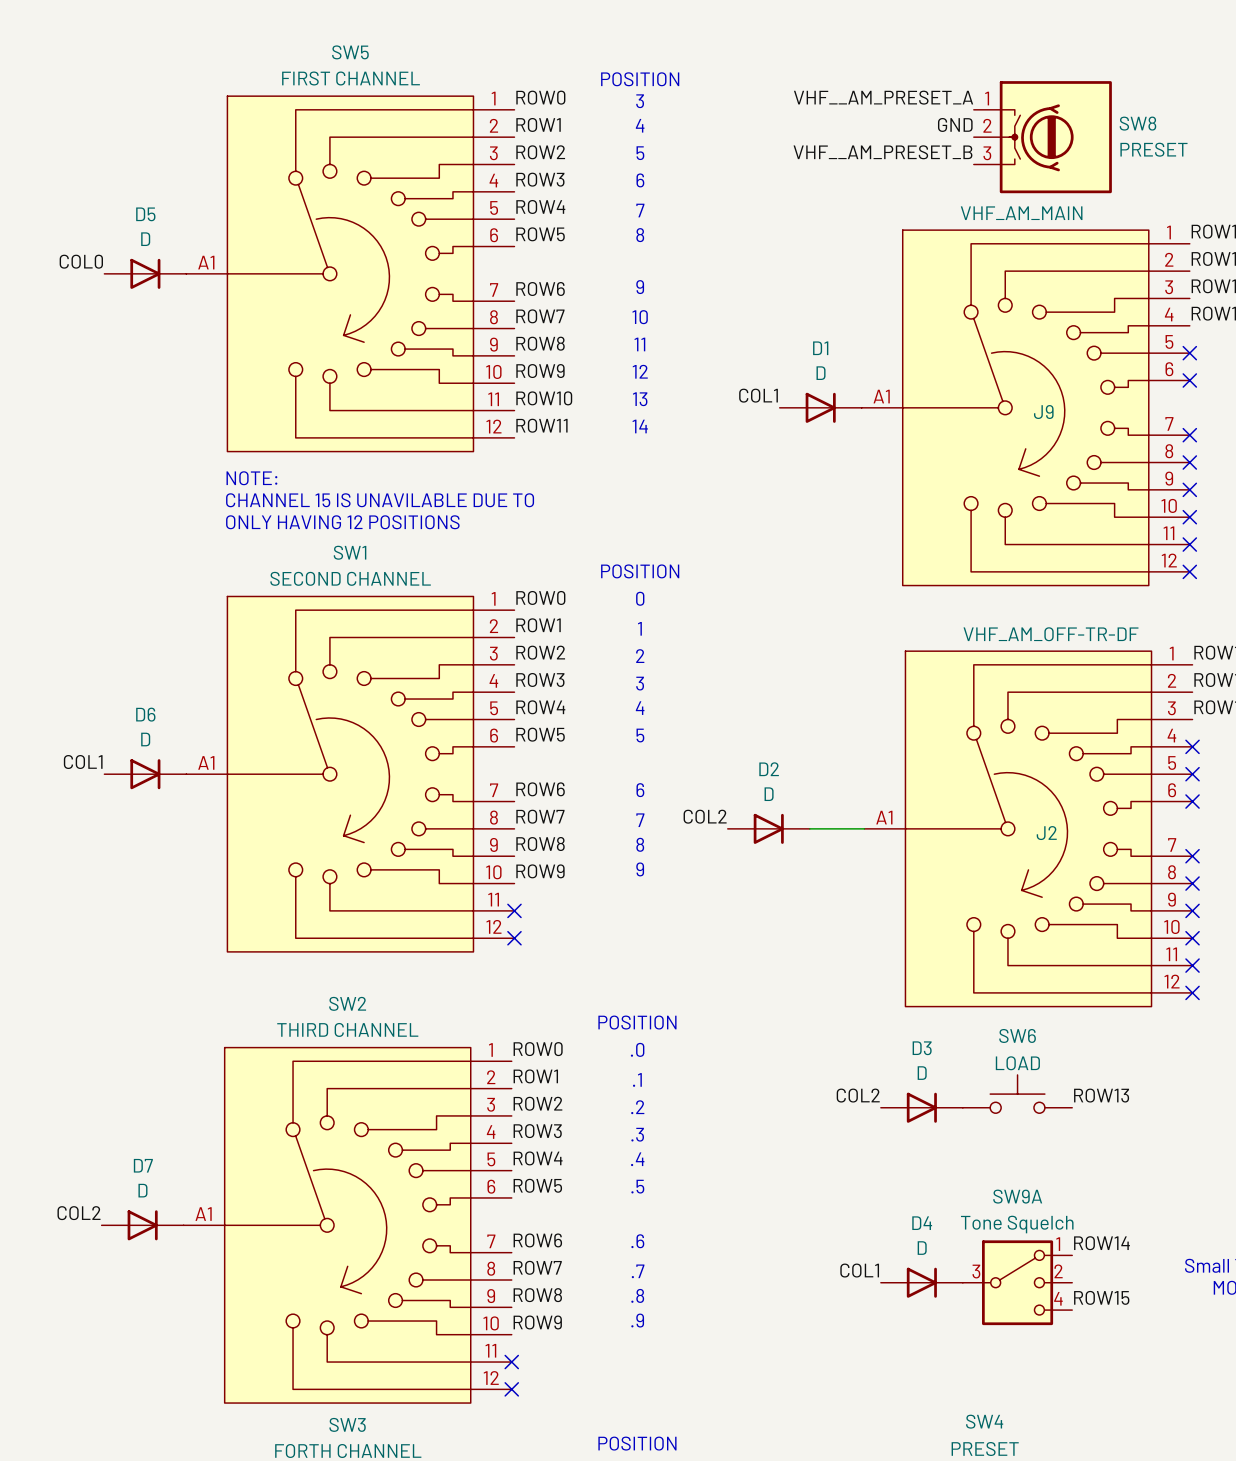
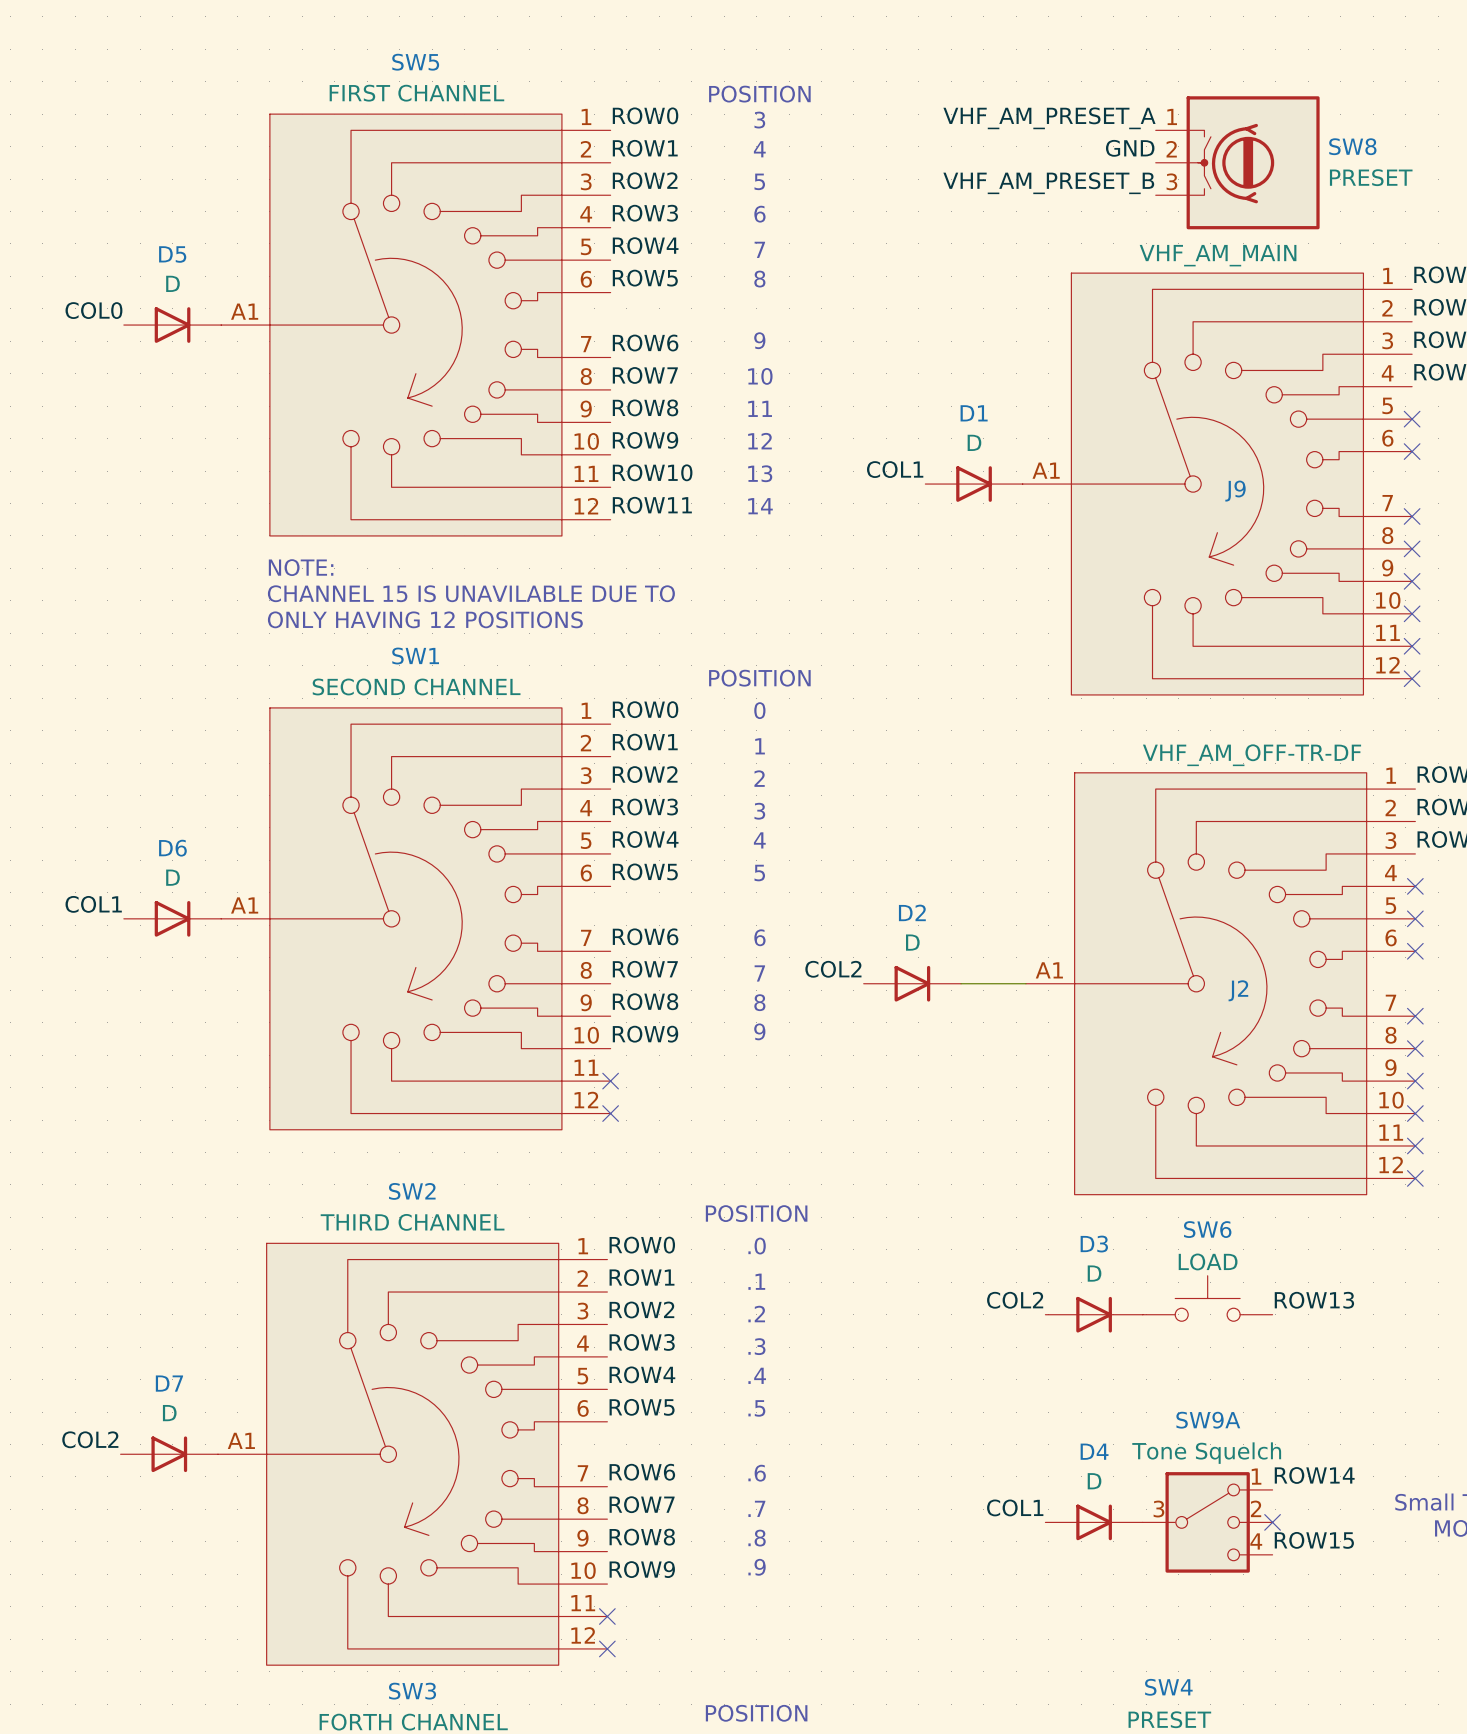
label: VHF__AM_PRESET_A (883, 97) -> VHF_AM_PRESET_A (1049, 118)
label: VHF__AM_PRESET_B (883, 152) -> VHF_AM_PRESET_B (1048, 183)
no-connect mark: none -> (1272, 1522)

